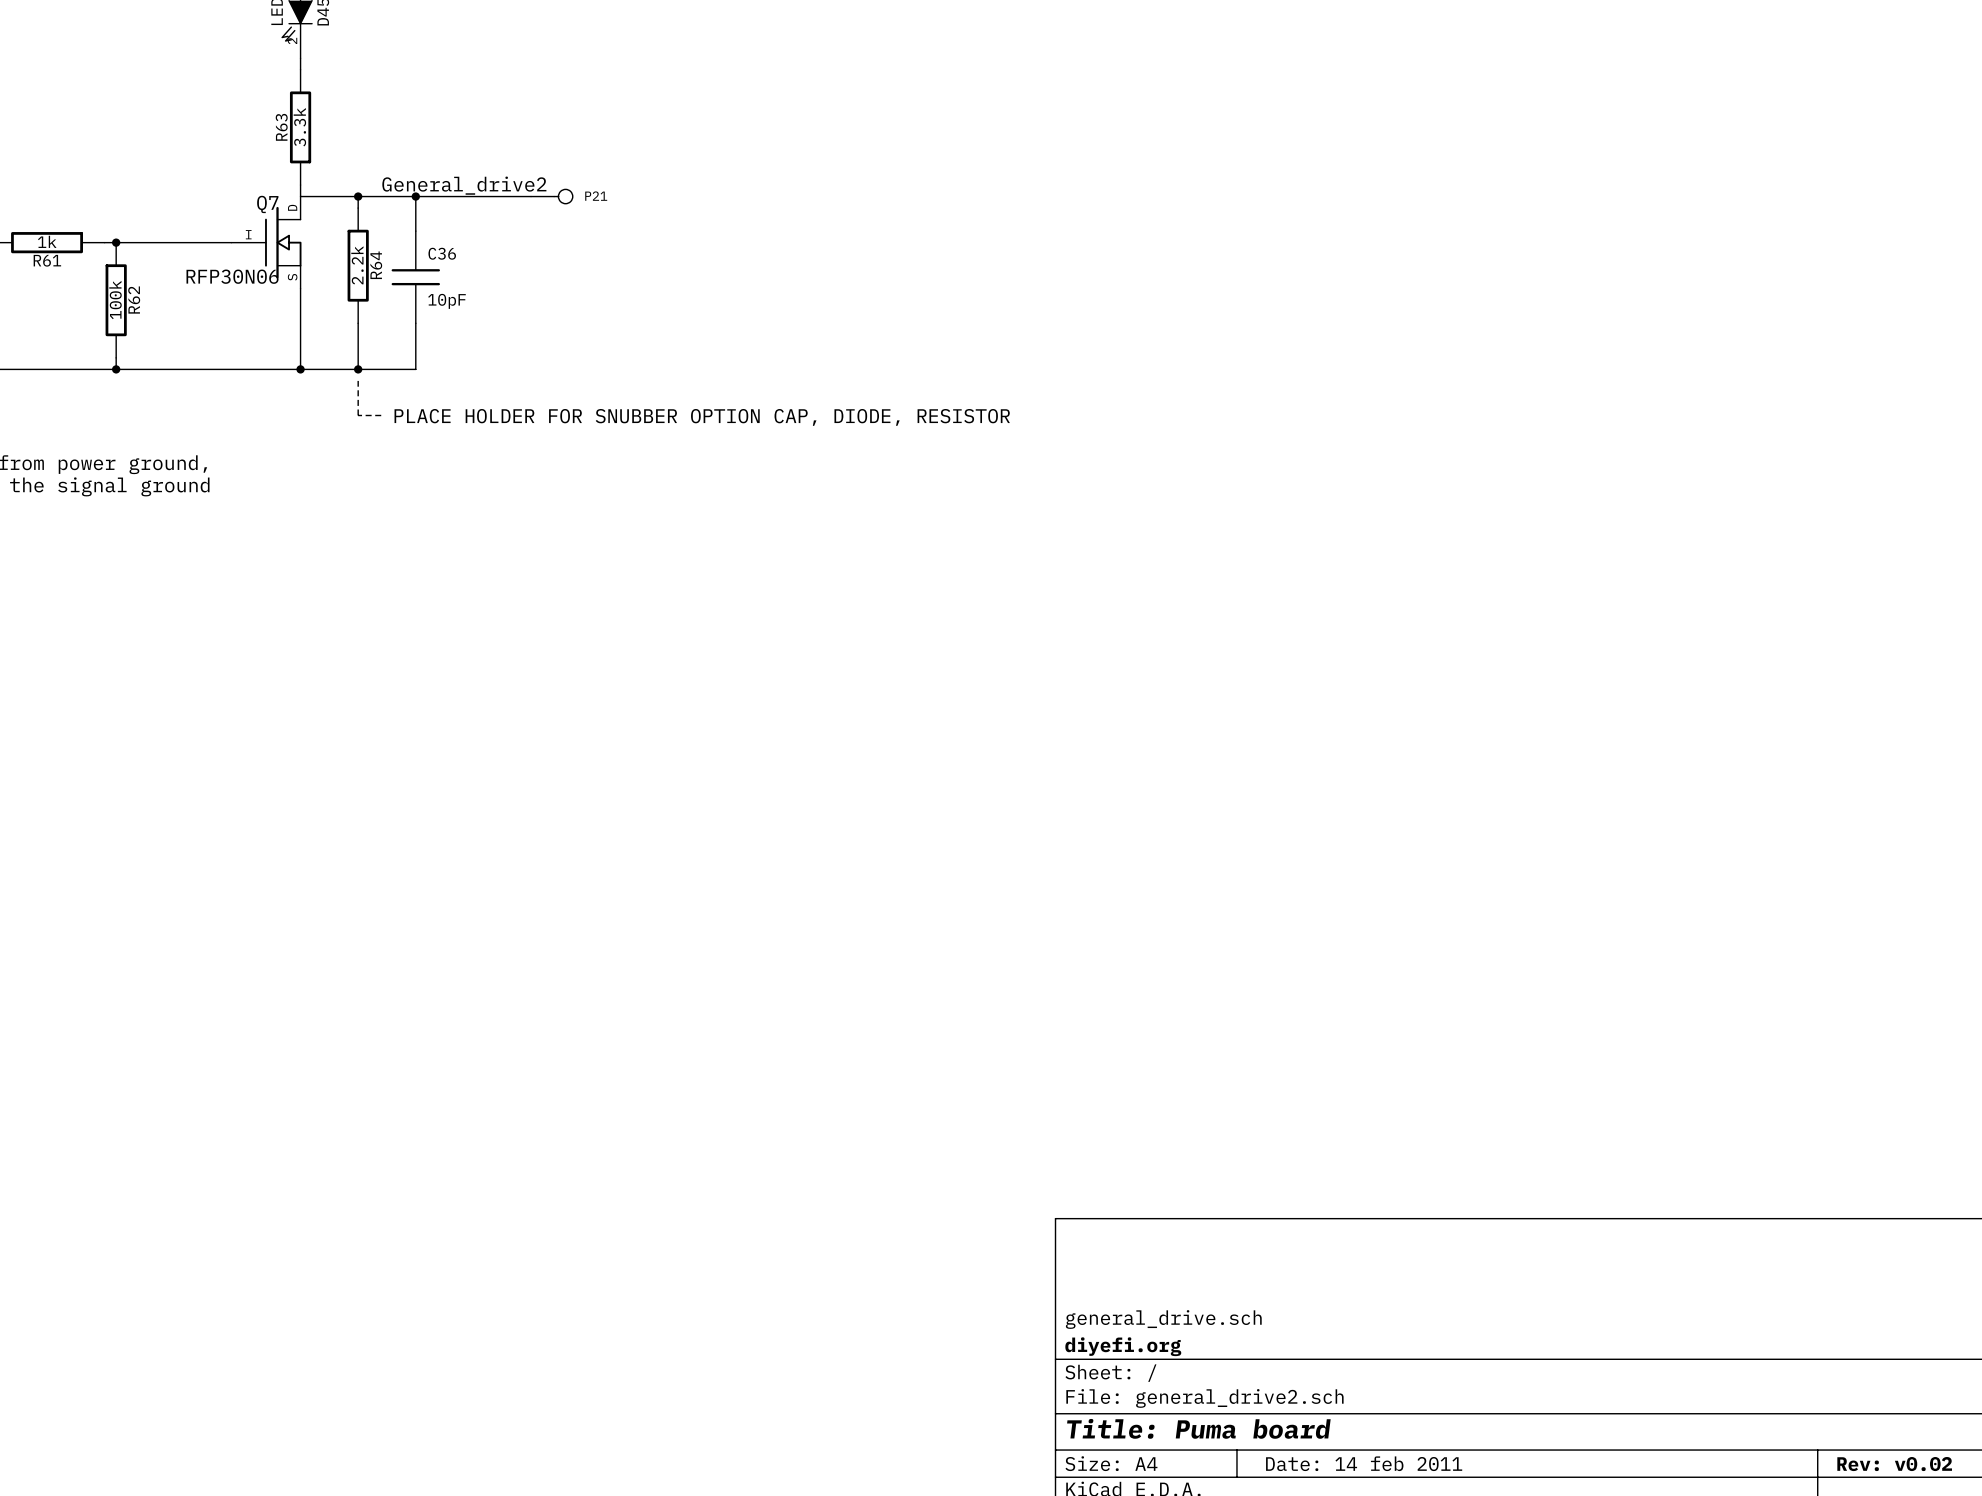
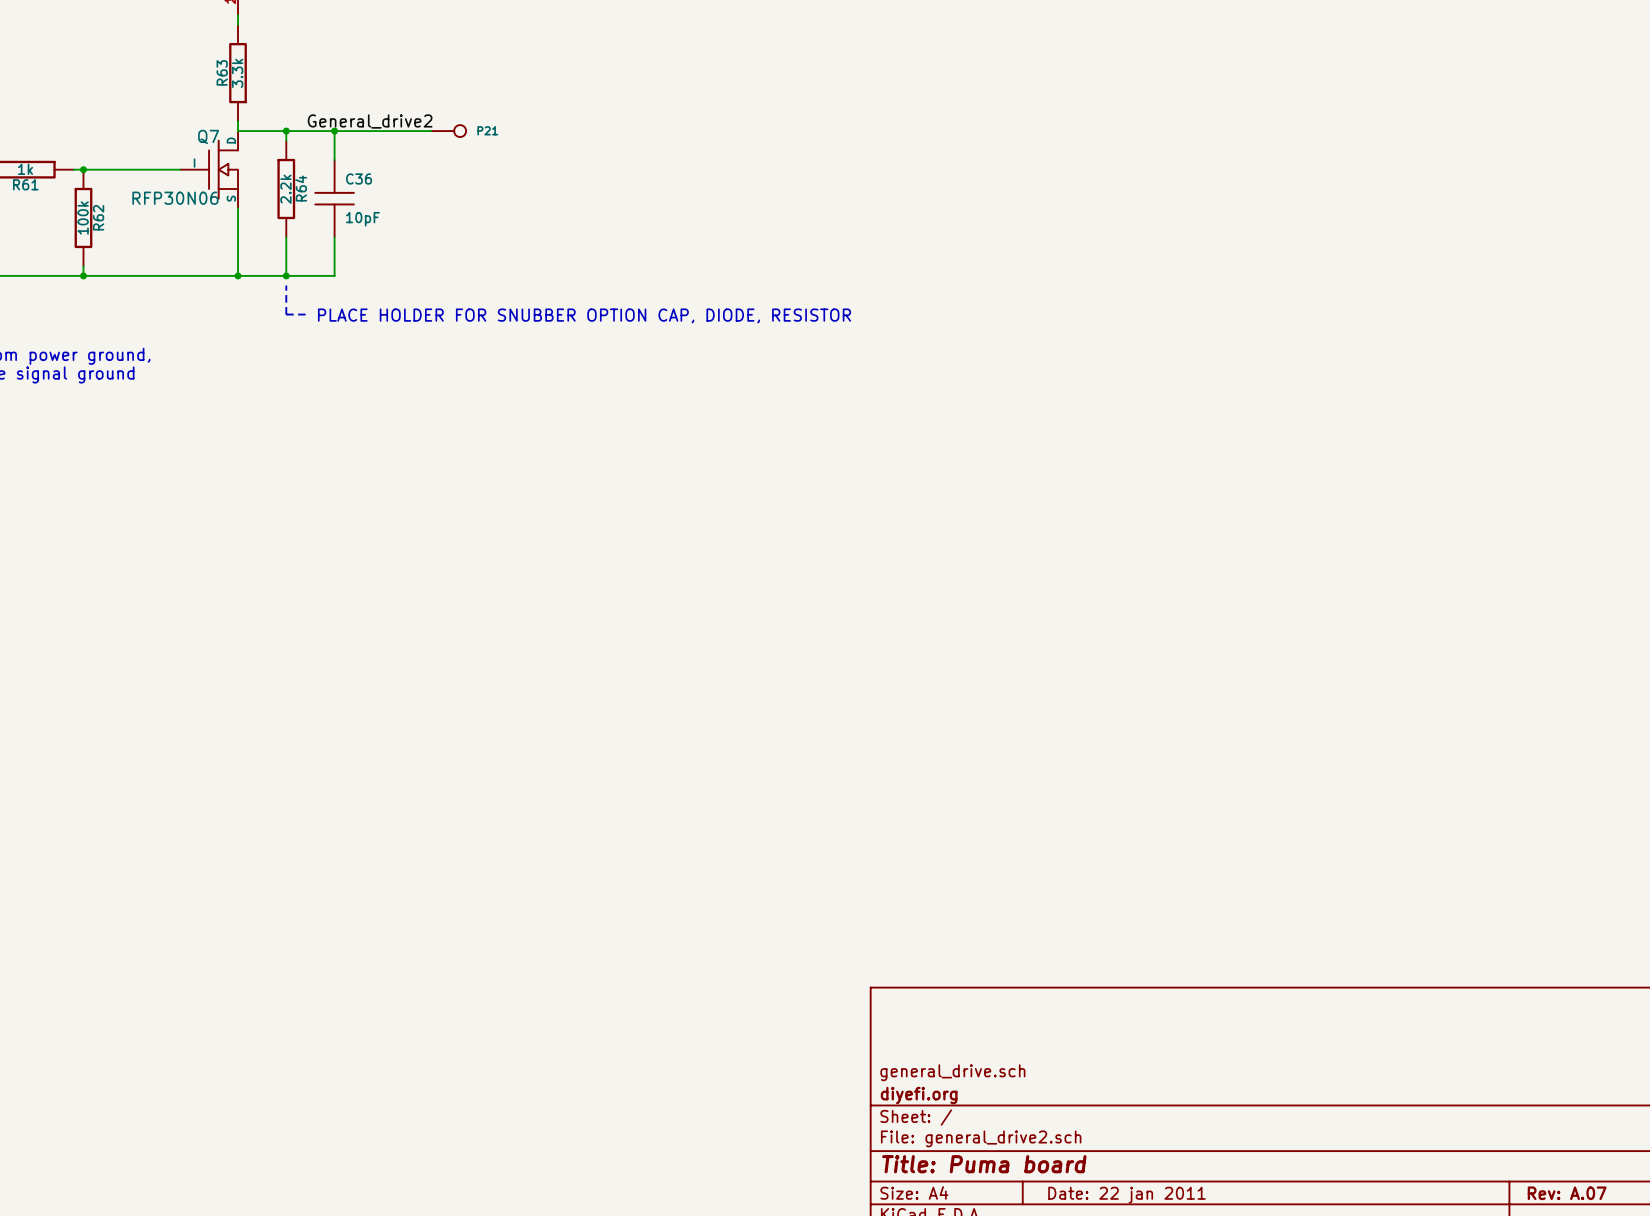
title block: Date: 14 feb 2011 (1364, 1463) -> Date: 22 jan 2011 (1126, 1195)
title block: Rev: v0.02 (1894, 1464) -> Rev: A.07 (1567, 1193)

